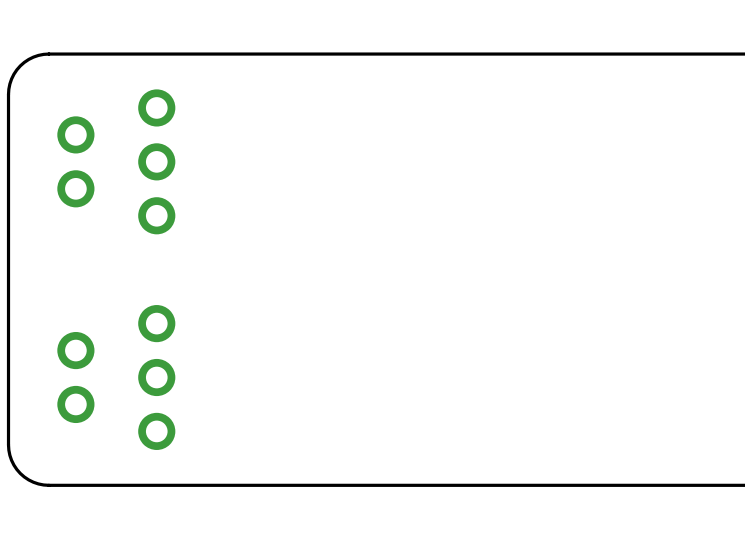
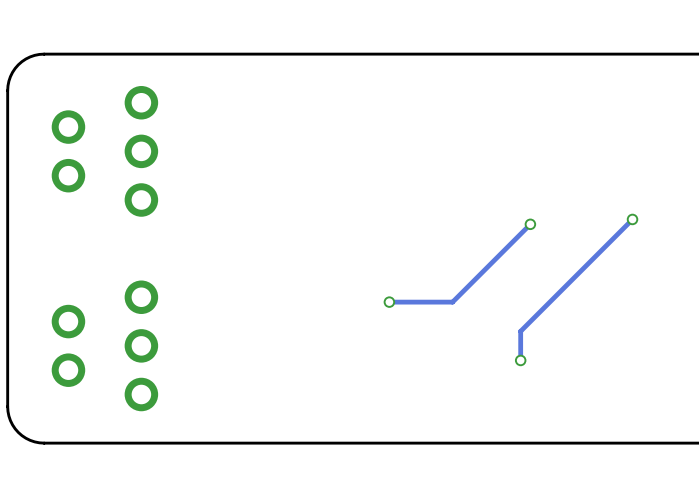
track: none -> (632, 219) (520, 331) (520, 360)
via: none -> (632, 219)
track: none -> (530, 224) (452, 302) (389, 302)
via: none -> (530, 224)
via: none -> (389, 302)
via: none -> (520, 360)

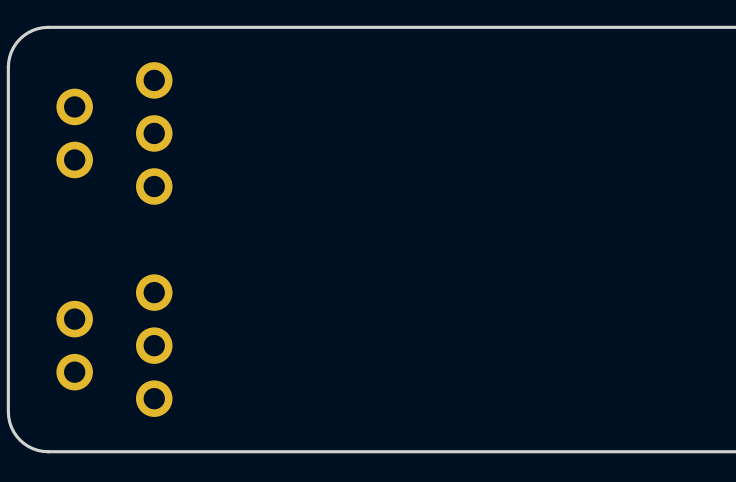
track: (632, 219) (520, 331) (520, 360) -> none
via: (632, 219) -> none
track: (530, 224) (452, 302) (389, 302) -> none
via: (530, 224) -> none
via: (389, 302) -> none
via: (520, 360) -> none

